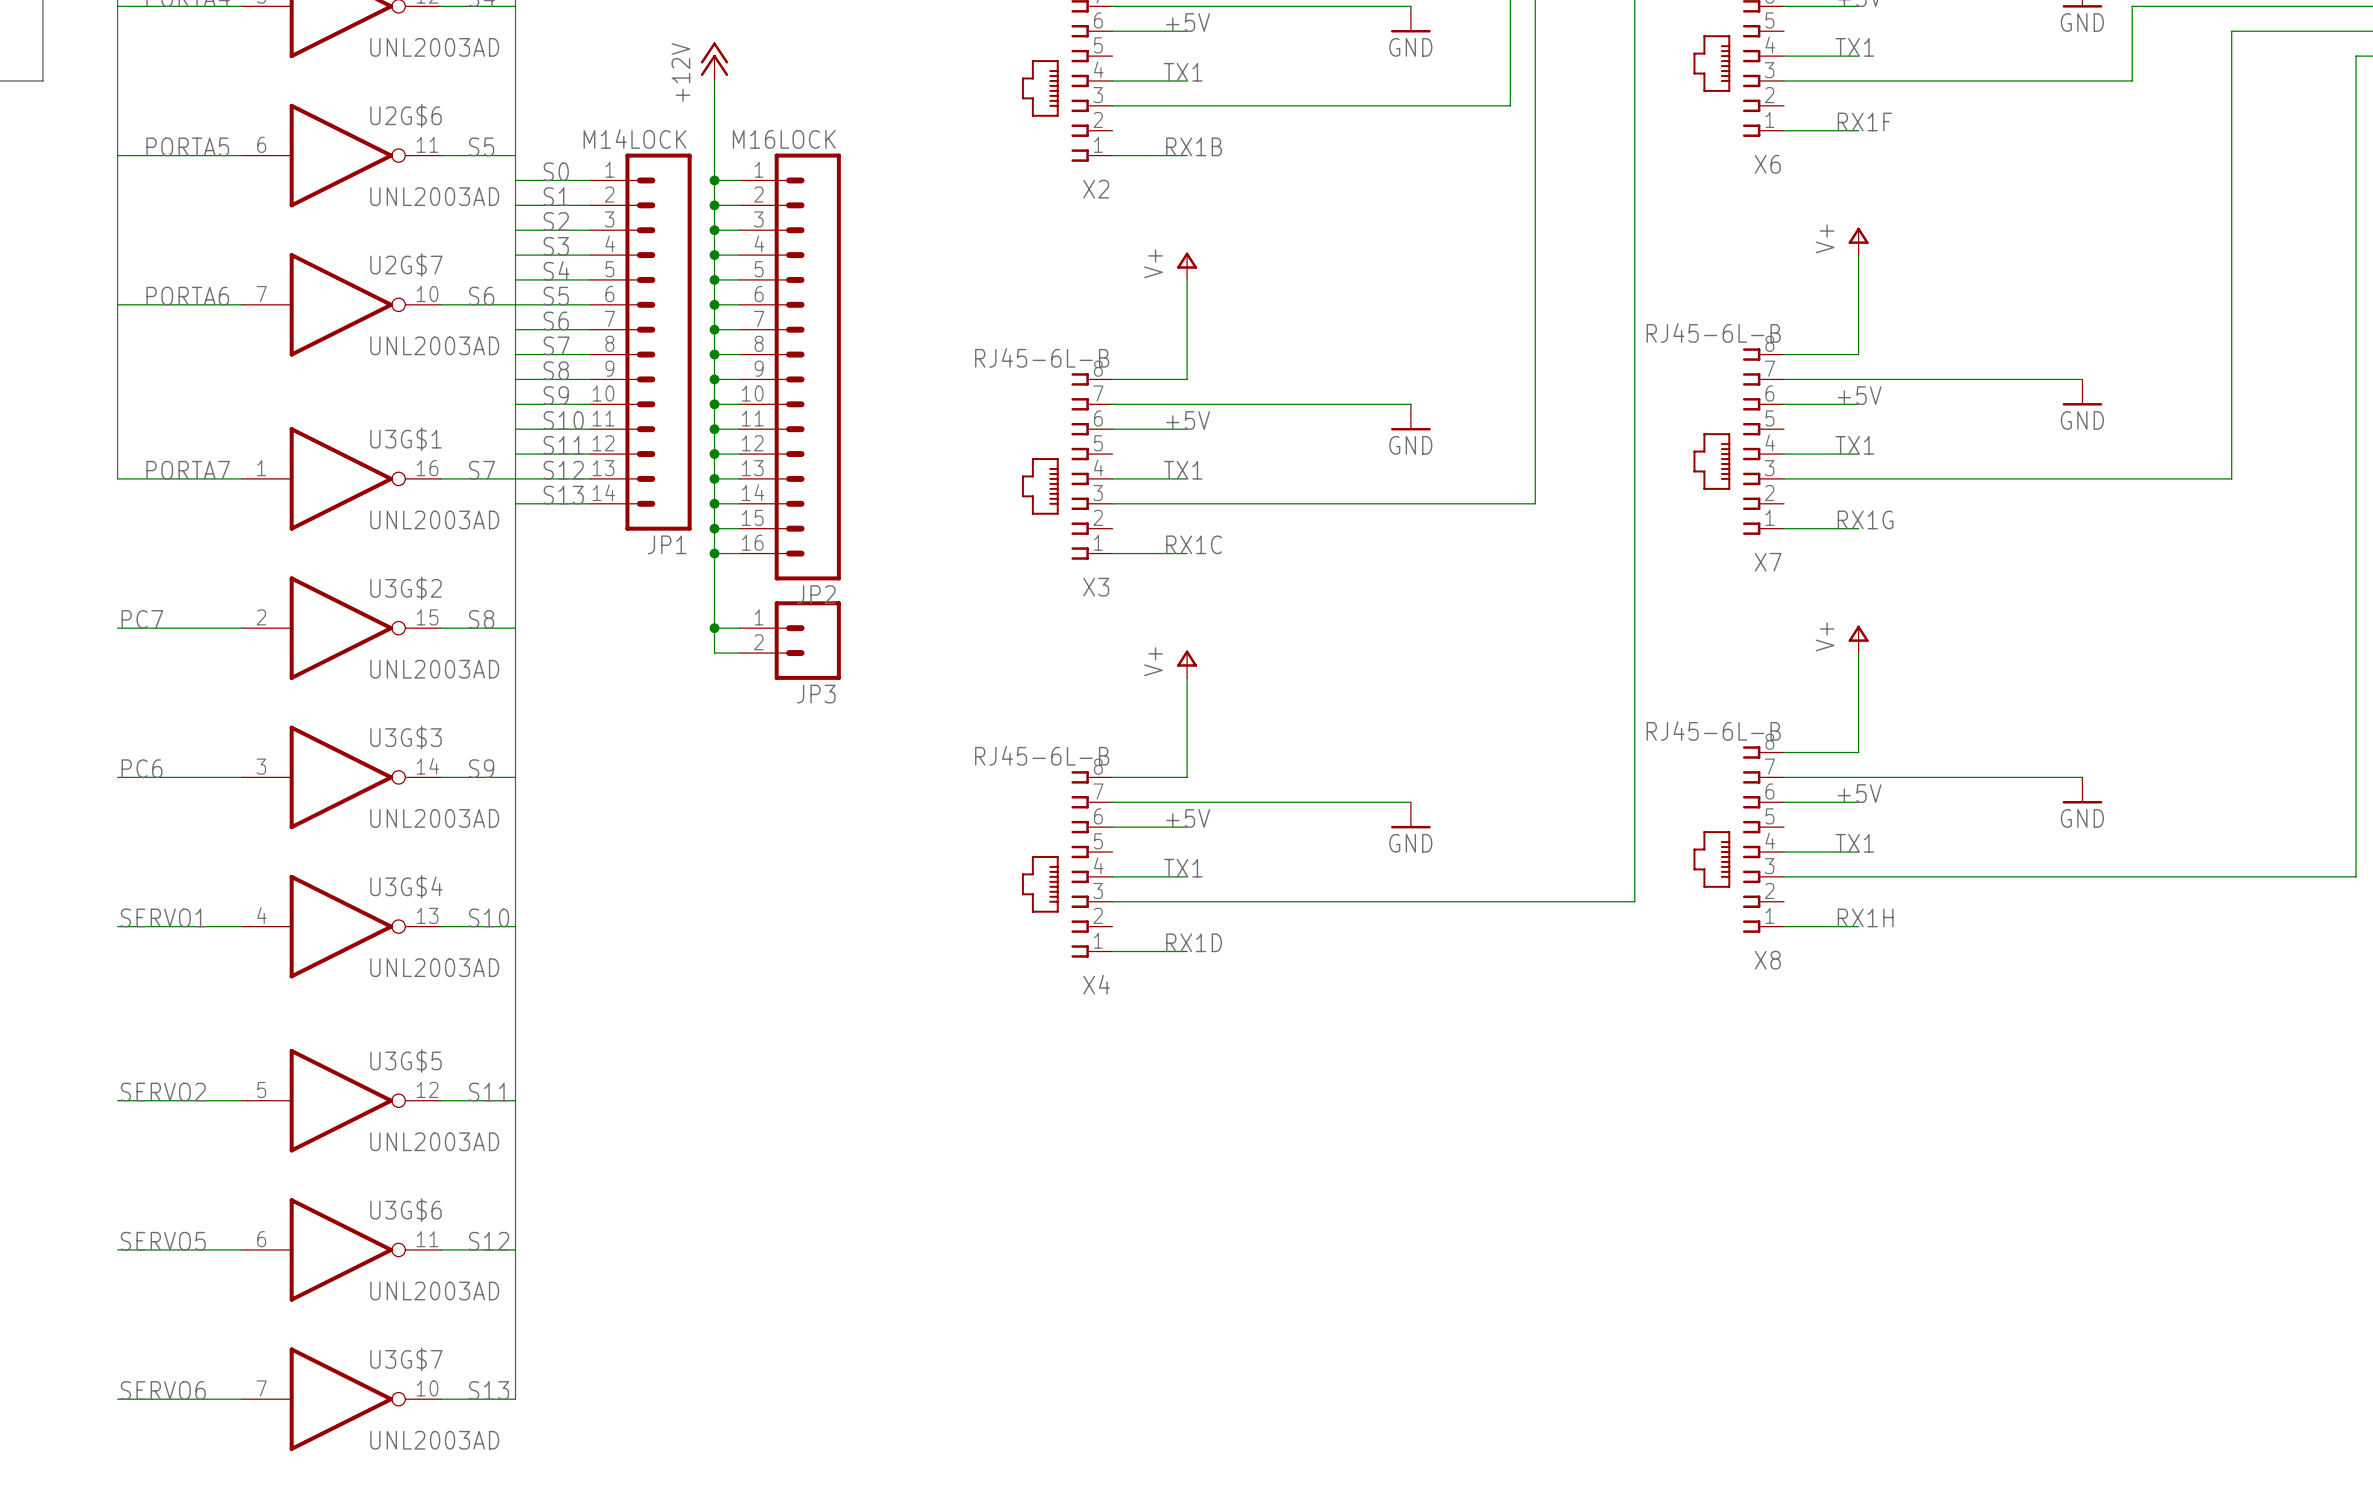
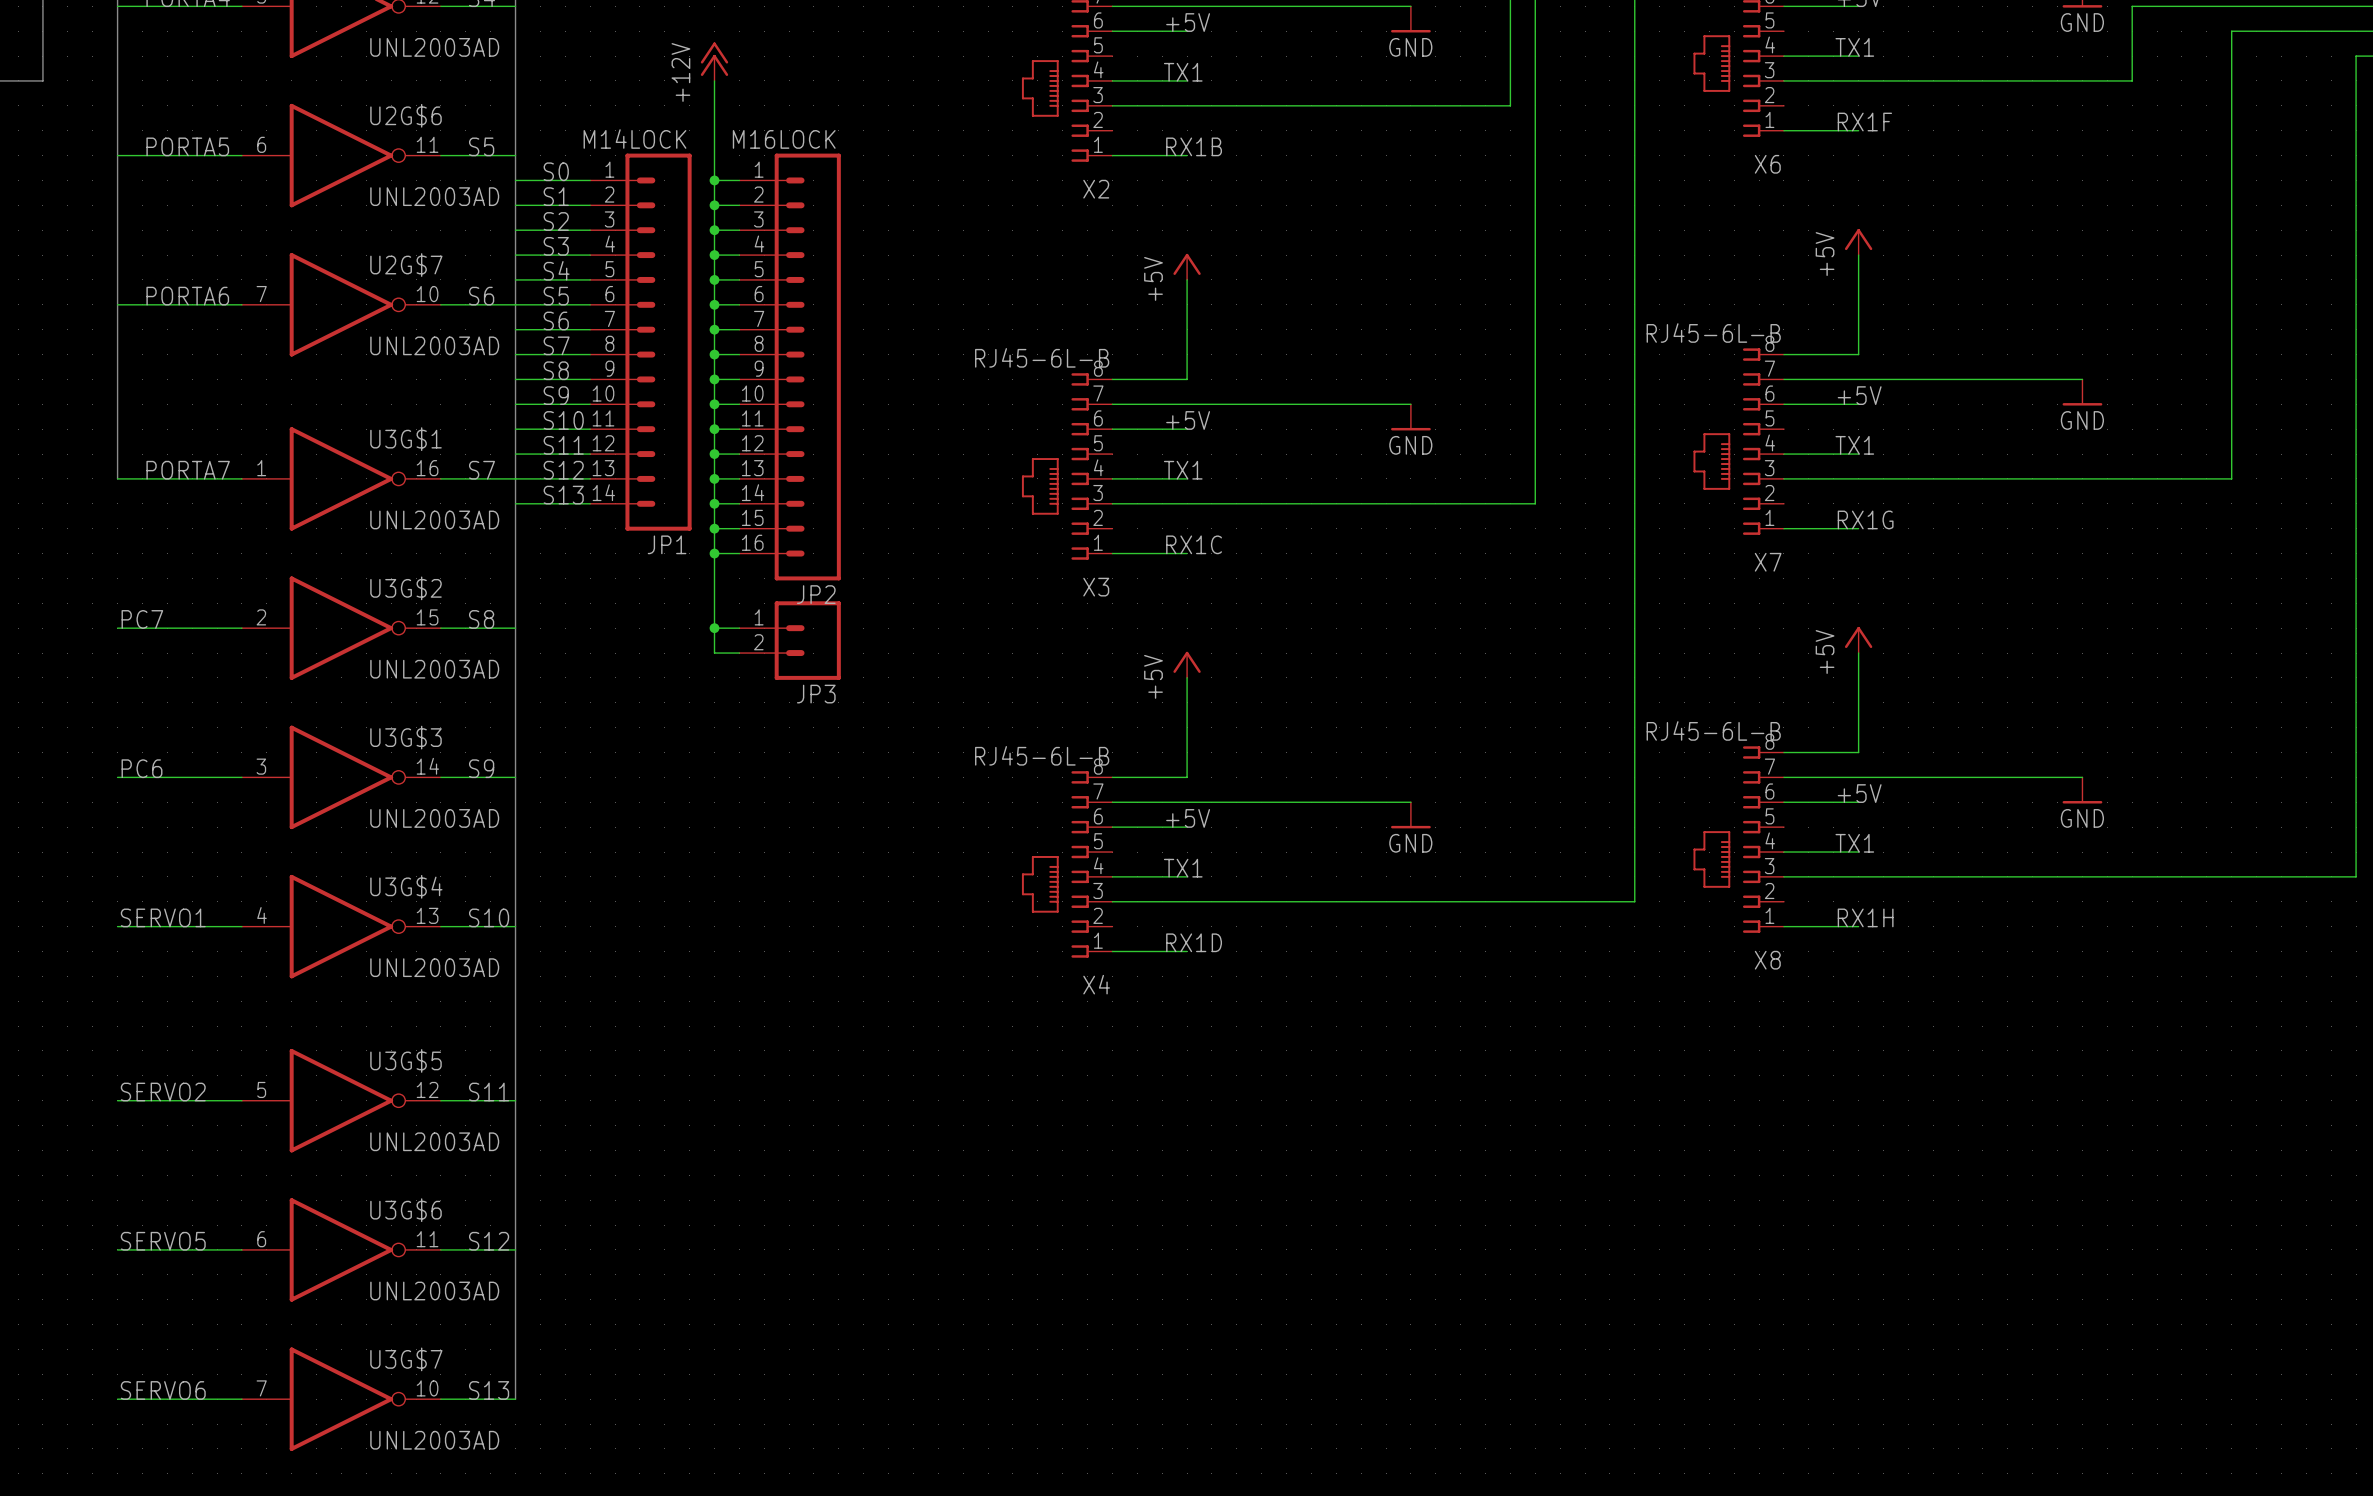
power symbol: V+ (1858, 241) -> +5V (1858, 242)
power symbol: V+ (1187, 266) -> +5V (1187, 266)
power symbol: V+ (1858, 639) -> +5V (1858, 639)
power symbol: V+ (1187, 664) -> +5V (1187, 664)

